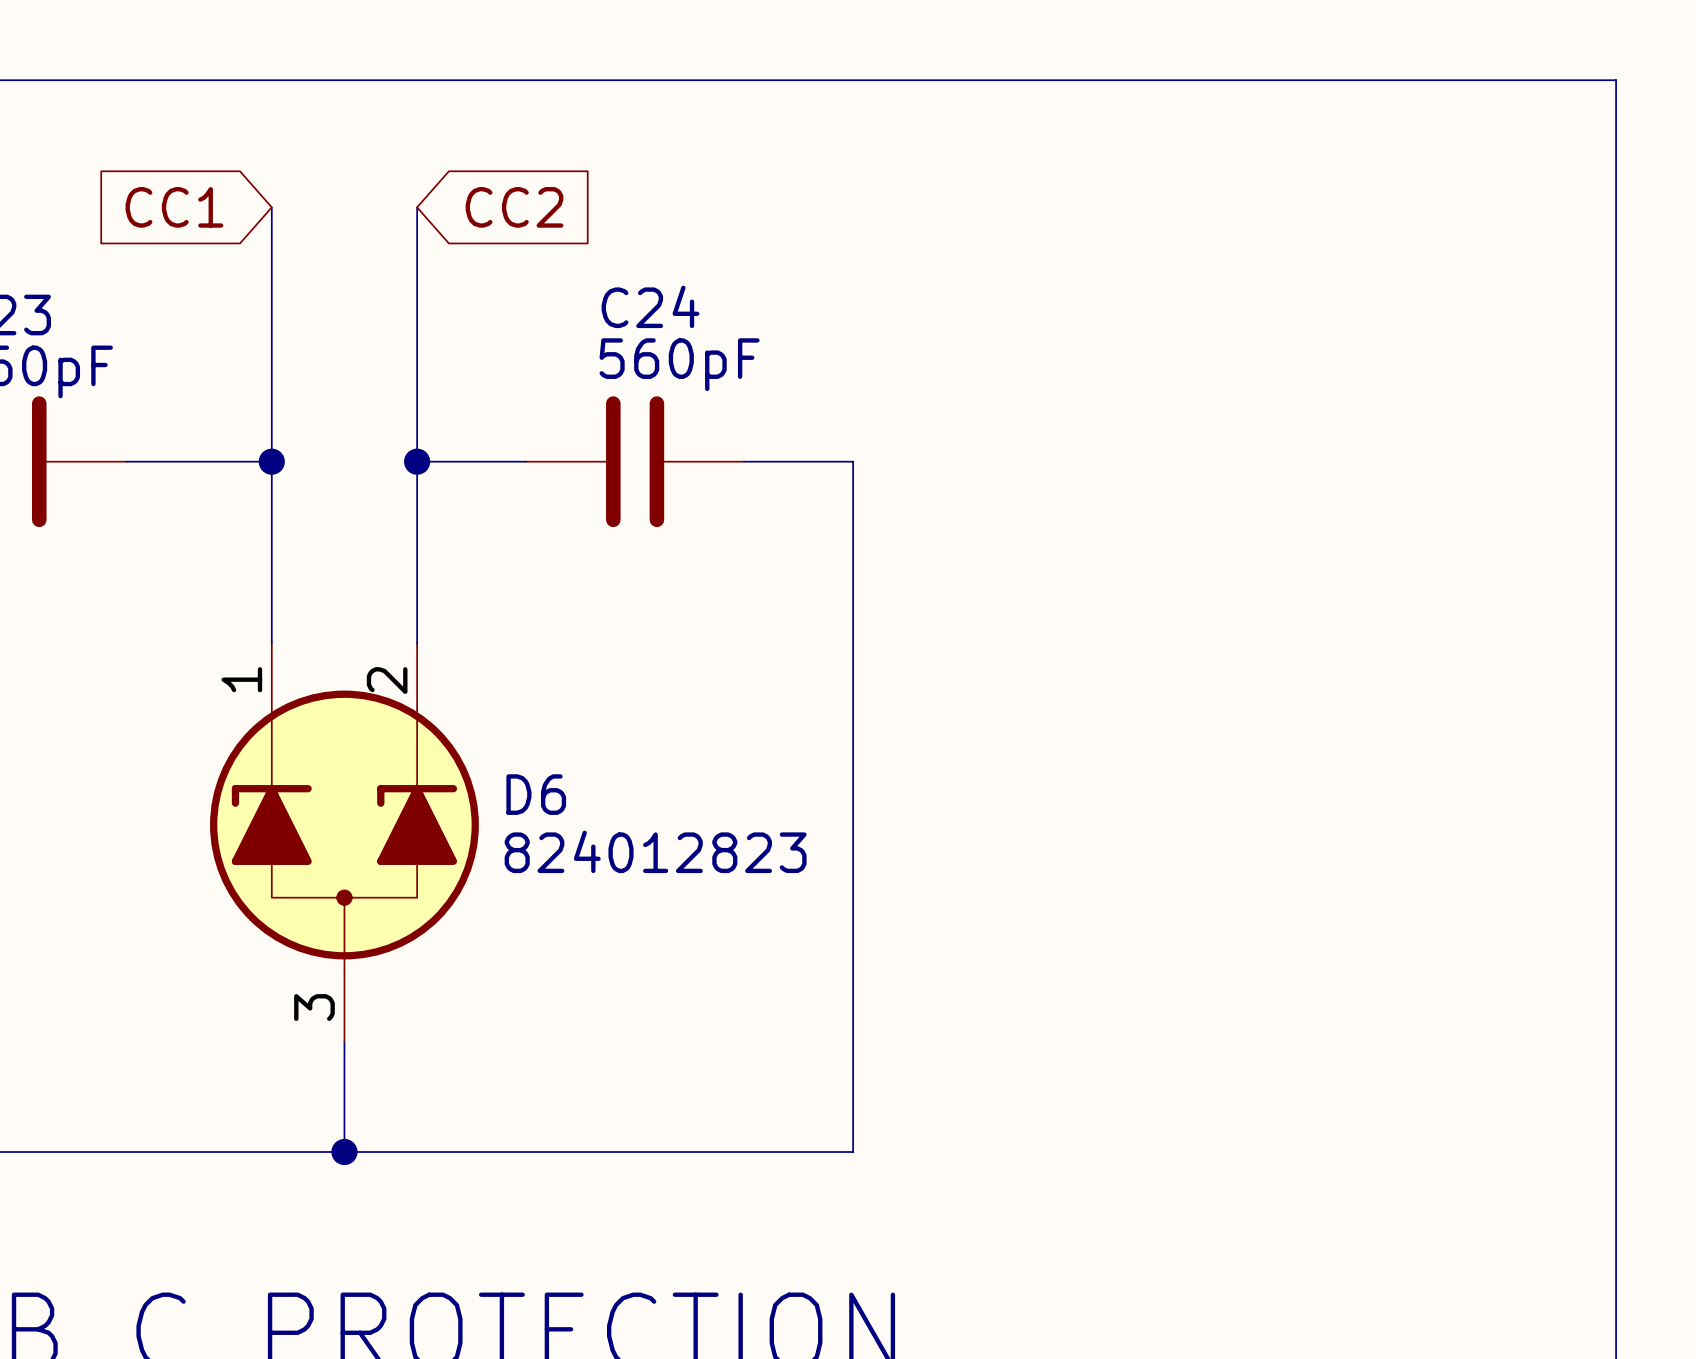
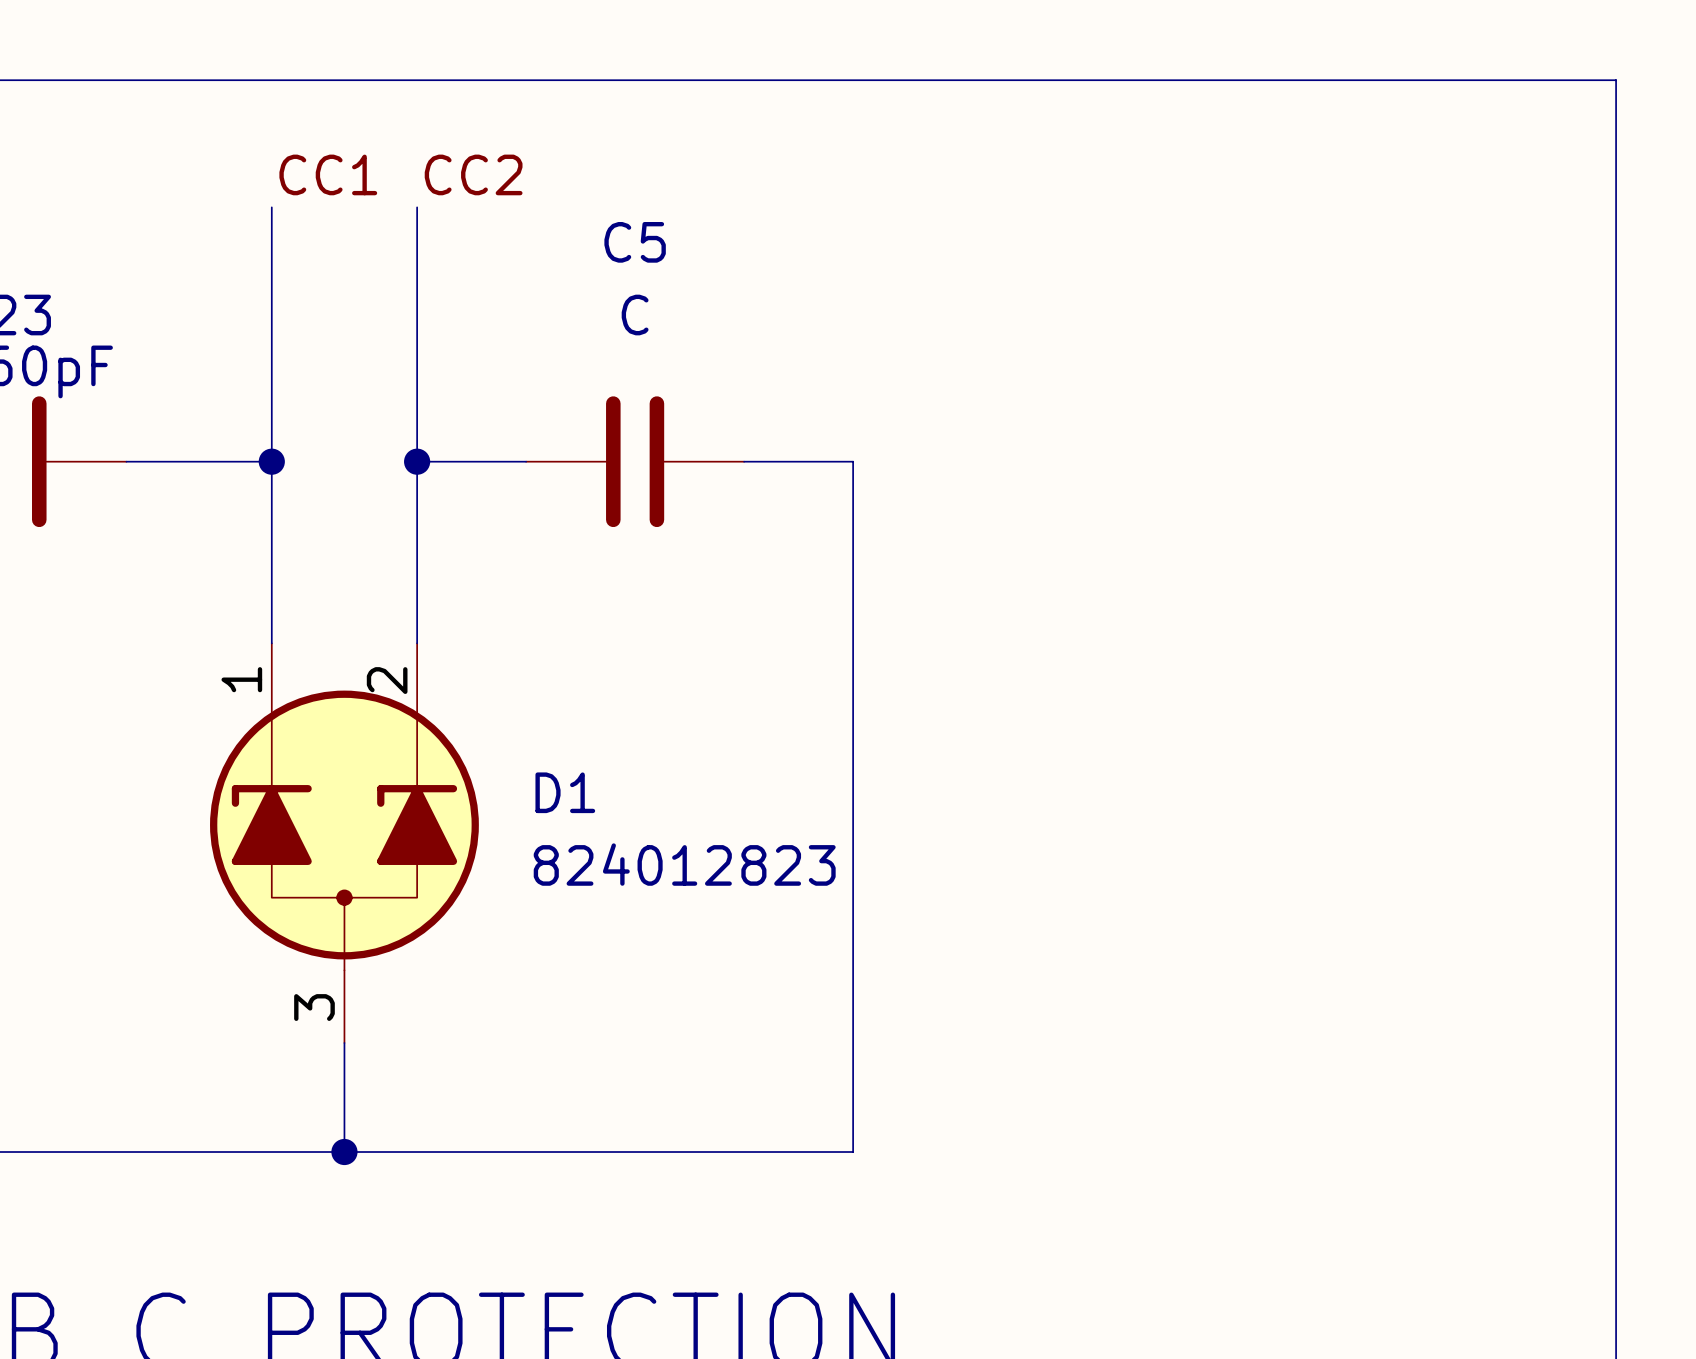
label: none -> CC1 (328, 174)
label: none -> CC2 (473, 174)
global label: CC1 (174, 207) -> none
global label: CC2 (514, 207) -> none
C24 name: C24 (650, 306) -> C5 (635, 242)
C24 value: 560pF (679, 364) -> C (635, 315)
D6 name: D6 (536, 794) -> D1 (565, 792)
D6 value position: 824012823 (655, 851) -> 824012823 (684, 864)

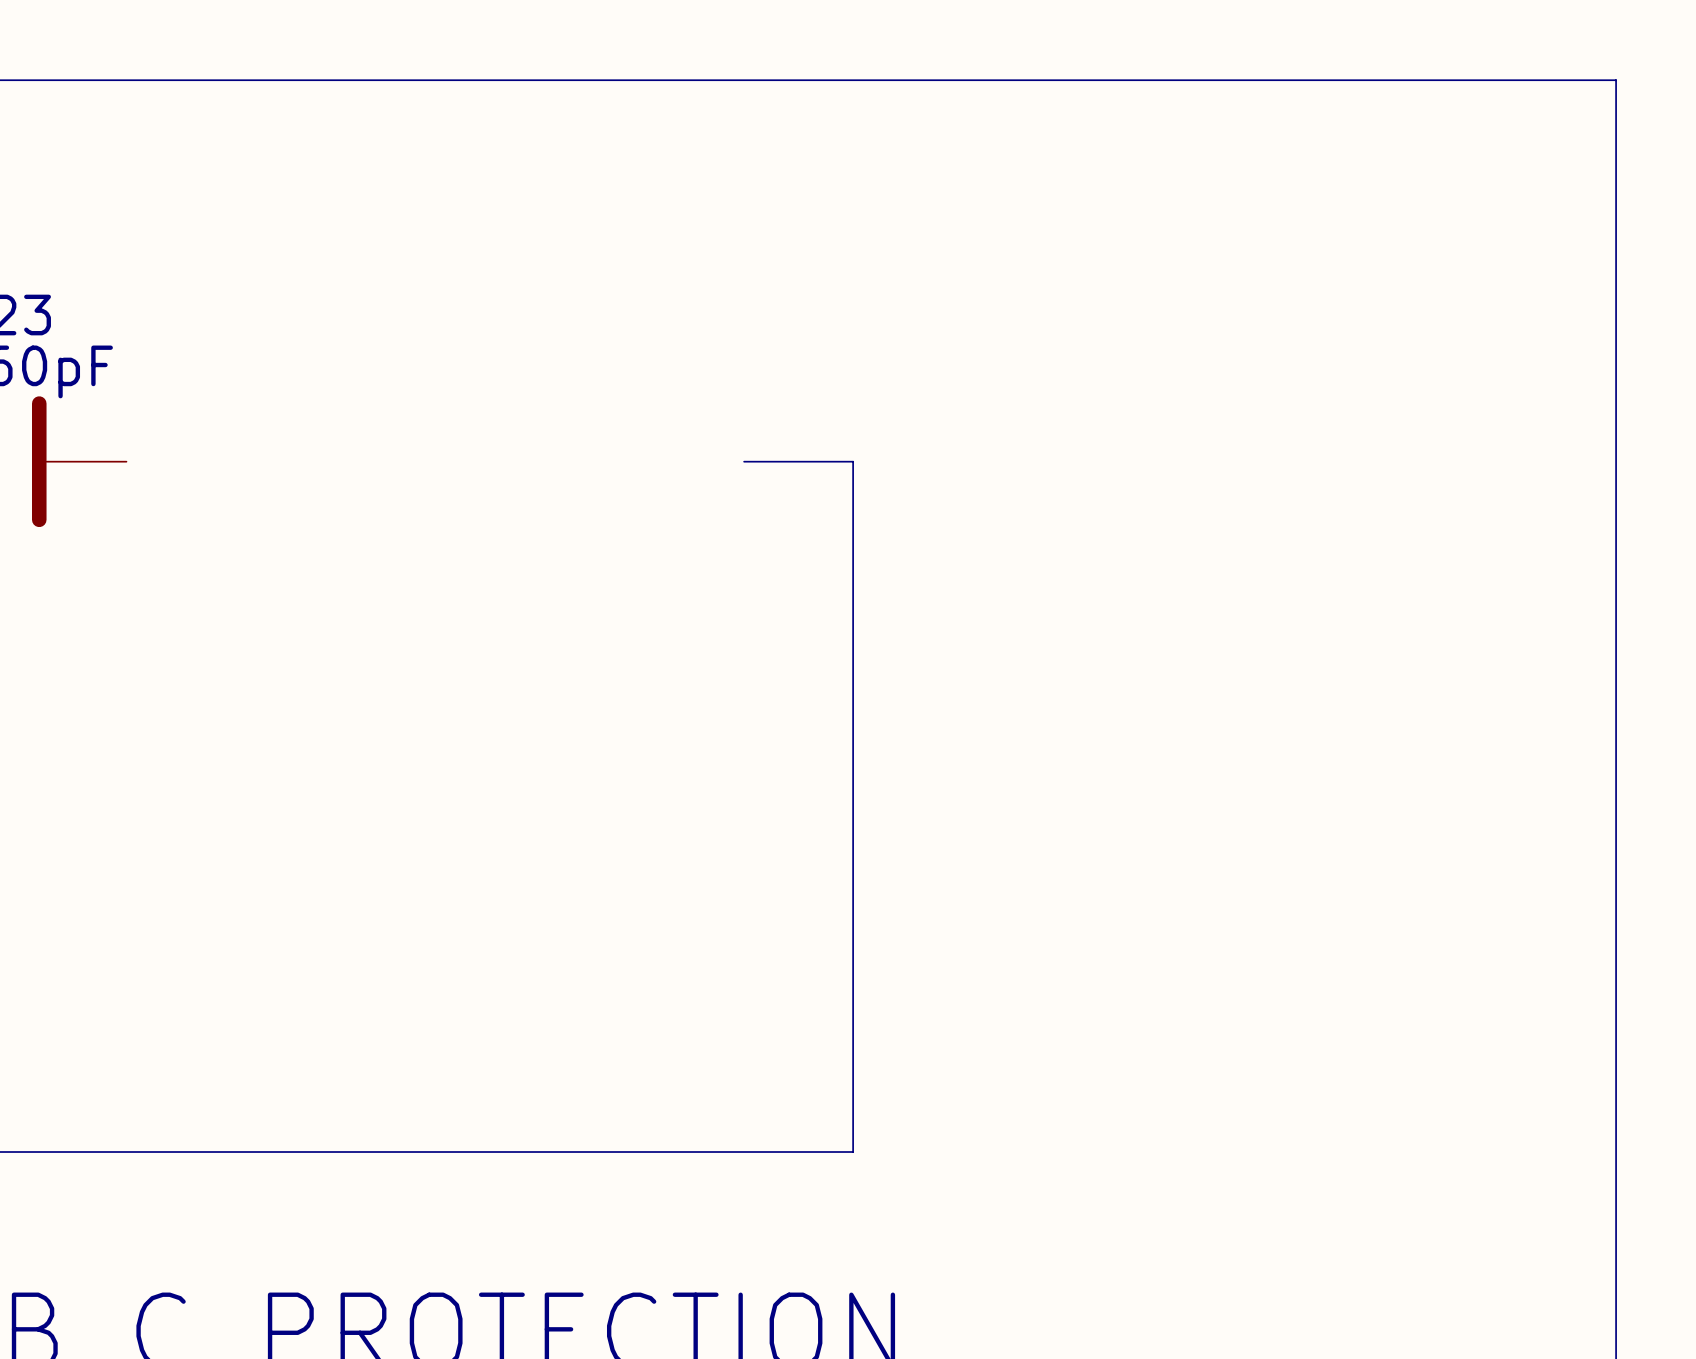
label: CC1 (328, 174) -> none
label: CC2 (473, 174) -> none
wire: (271, 207) (271, 643) -> none
wire: (417, 207) (417, 643) -> none
wire: (126, 461) (271, 461) -> none
junction: (271, 461) -> none
wire: (417, 461) (526, 461) -> none
junction: (417, 461) -> none
C5: C (635, 461) -> none
D1: 824012823 (344, 843) -> none
wire: (344, 1043) (344, 1152) -> none
junction: (344, 1152) -> none

